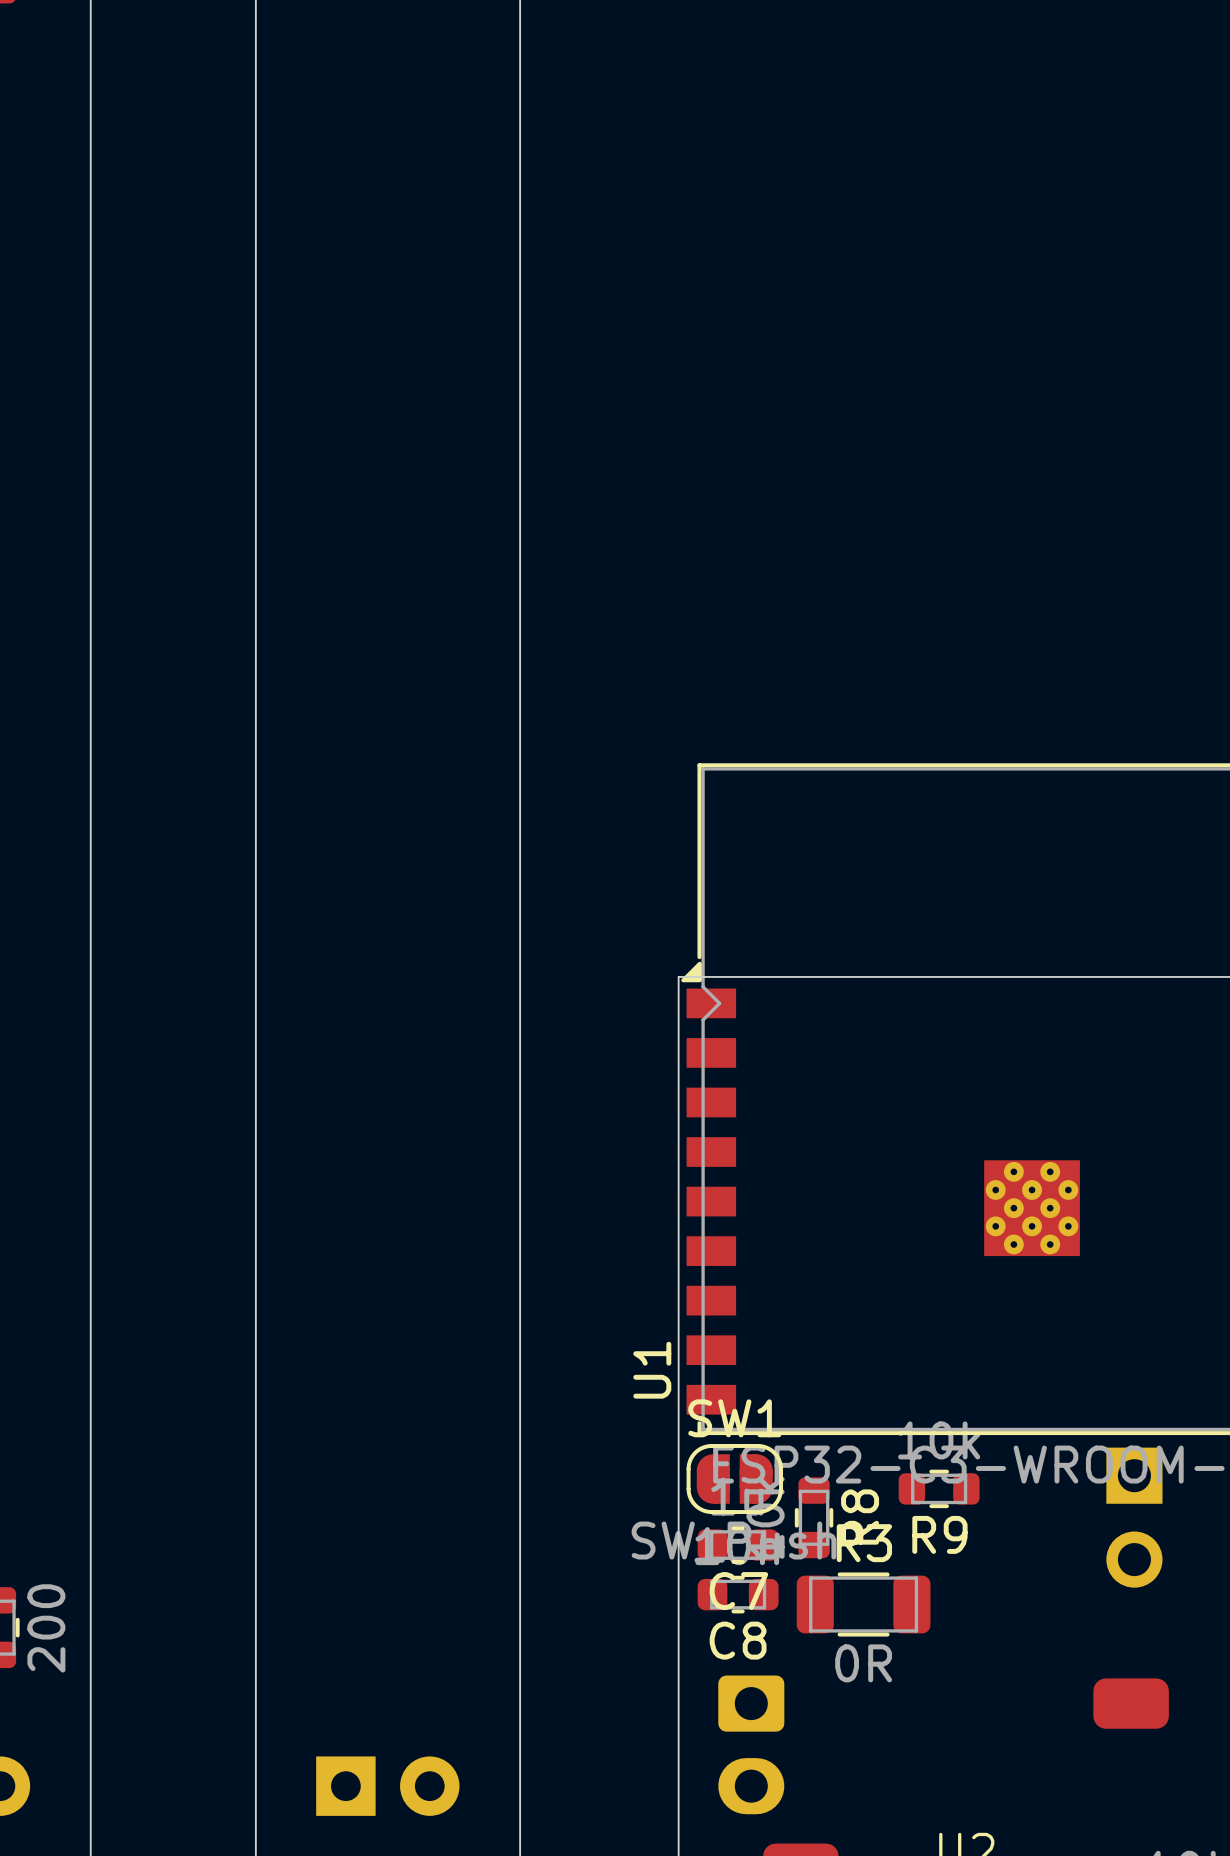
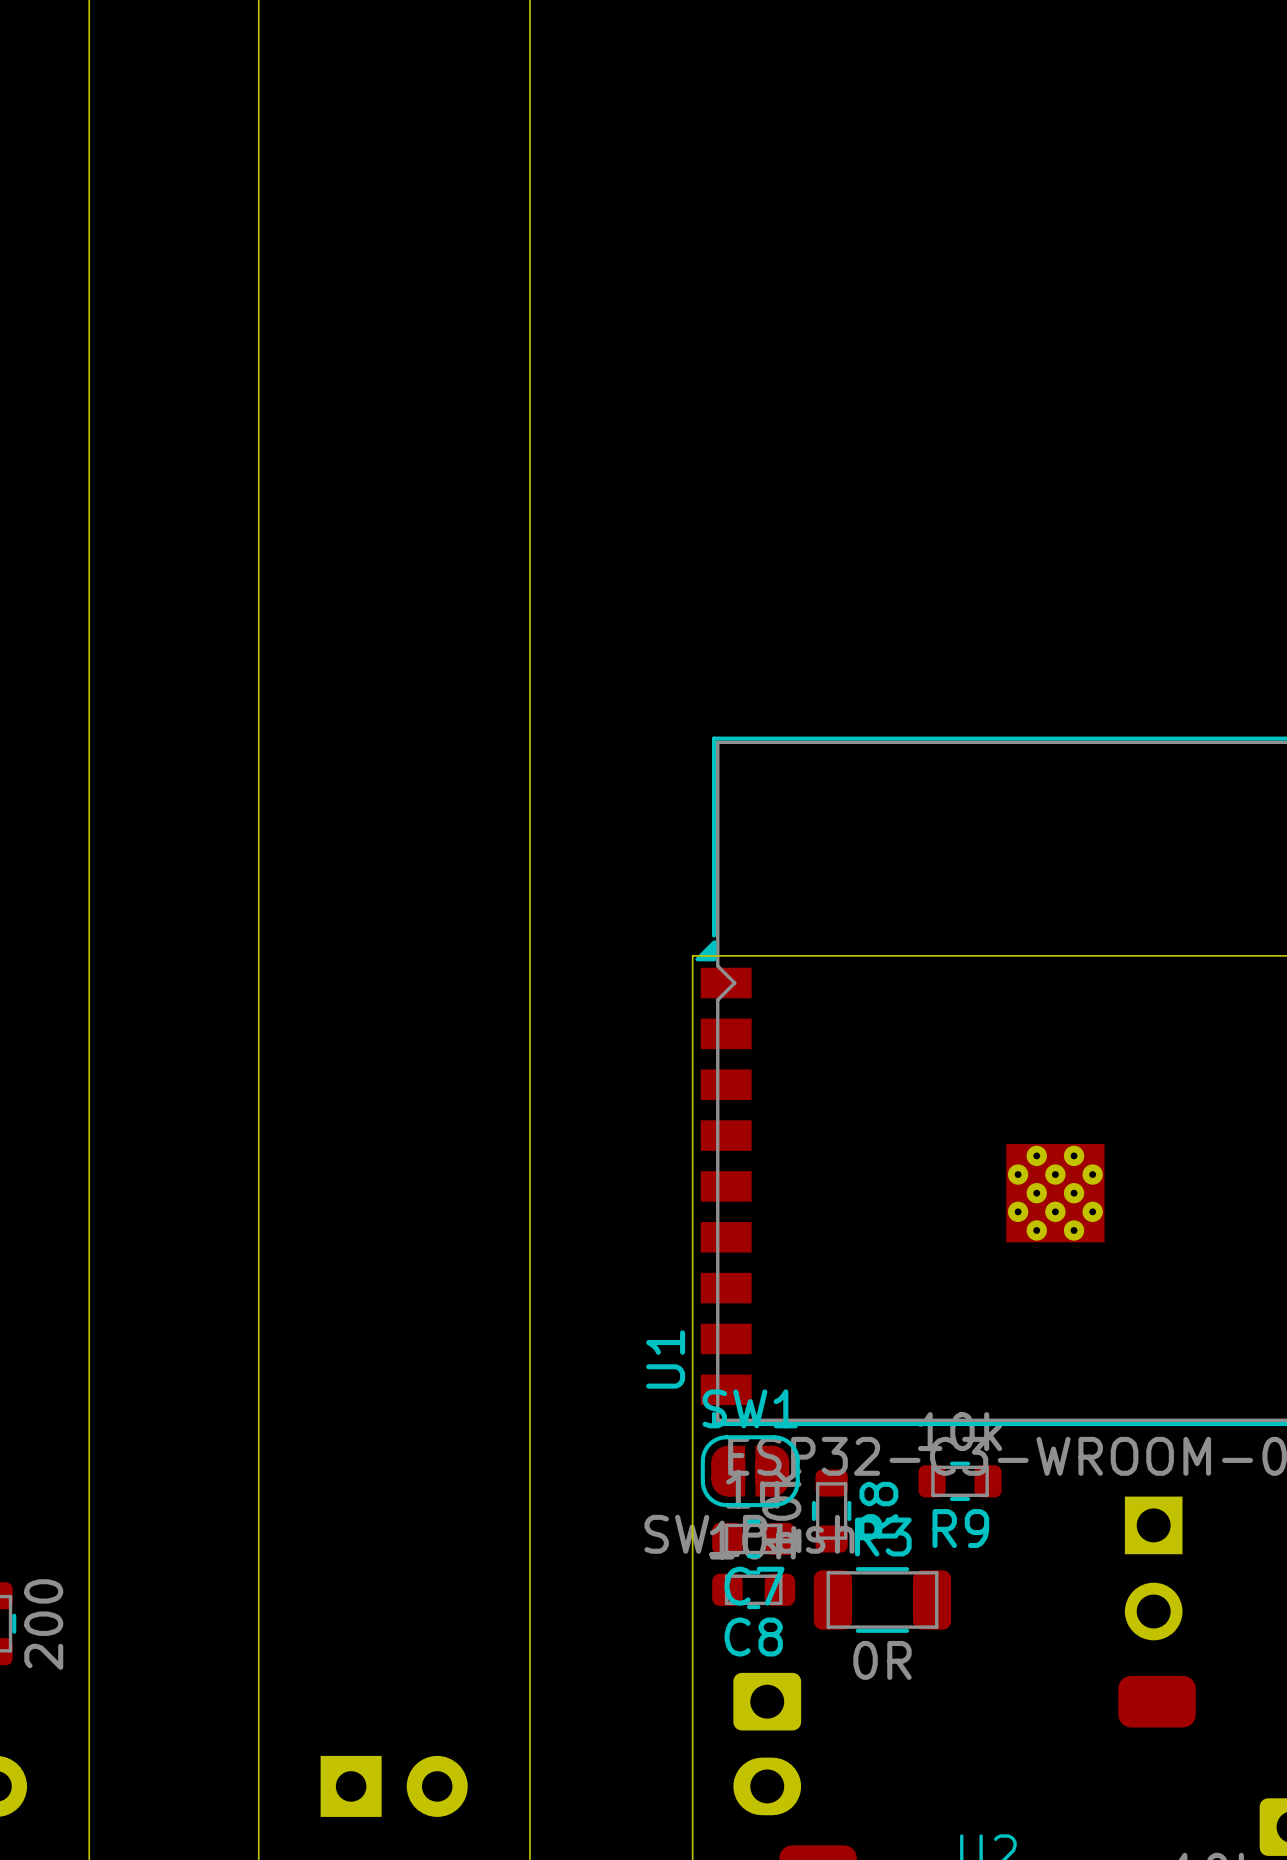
part position: (1134, 1517) -> (1153, 1568)

